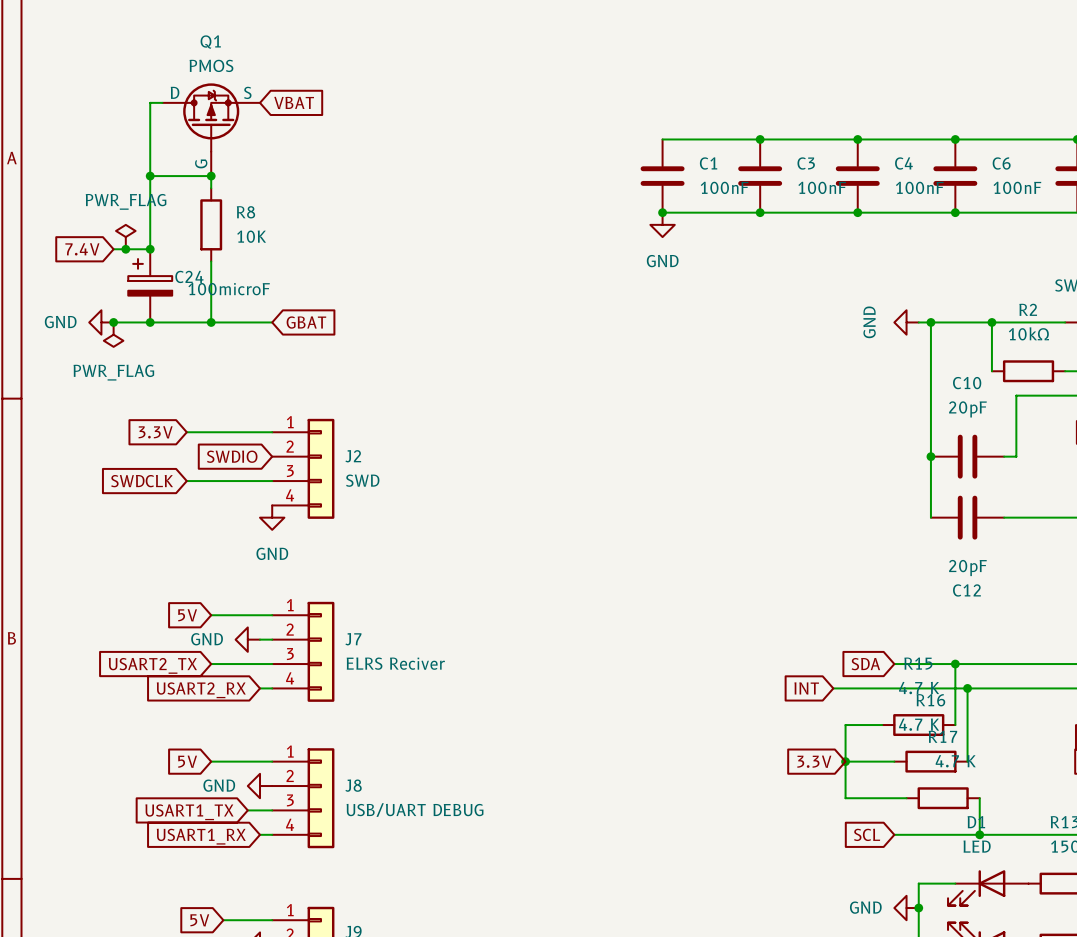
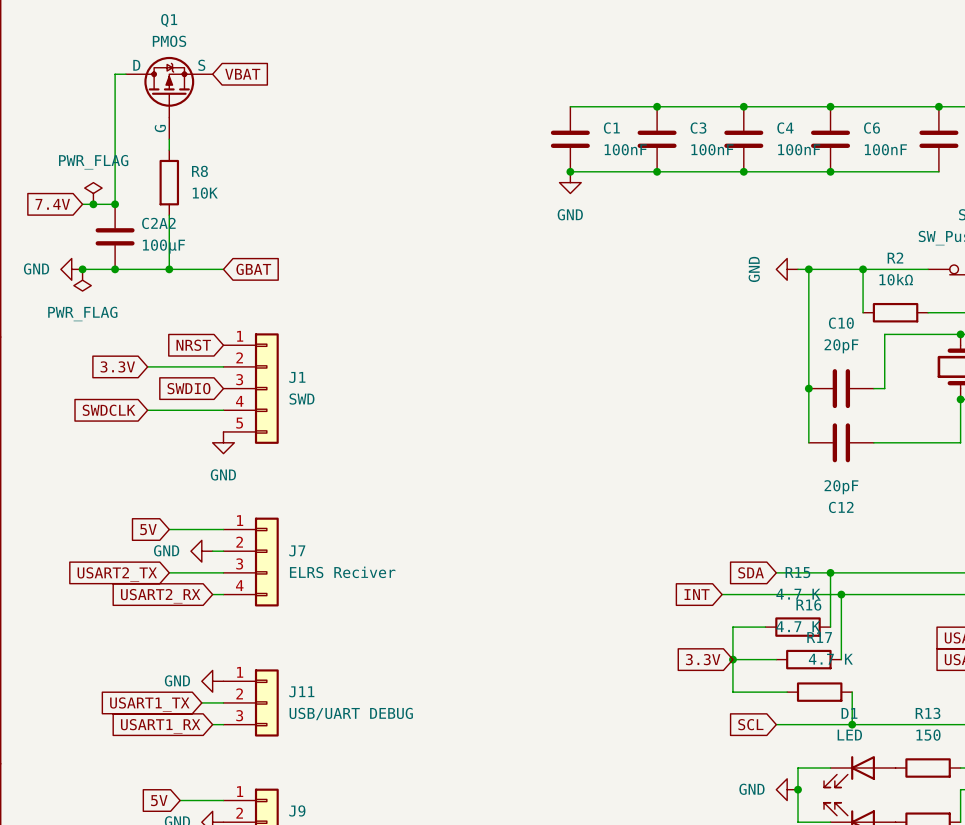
wire: (150, 176) (211, 176) -> none
junction: (150, 176) -> none
junction: (211, 176) -> none
C24: 100microF (150, 285) -> none
C2A2: none -> 100µF (115, 236)
global label: none -> NRST (193, 345)
J1: none -> SWD (251, 388)
J2: SWD (303, 468) -> none
global label: 5V (187, 761) -> none
wire: (211, 761) (272, 761) -> none
J8: USB/UART DEBUG (303, 798) -> none
J11: none -> USB/UART DEBUG (251, 702)

